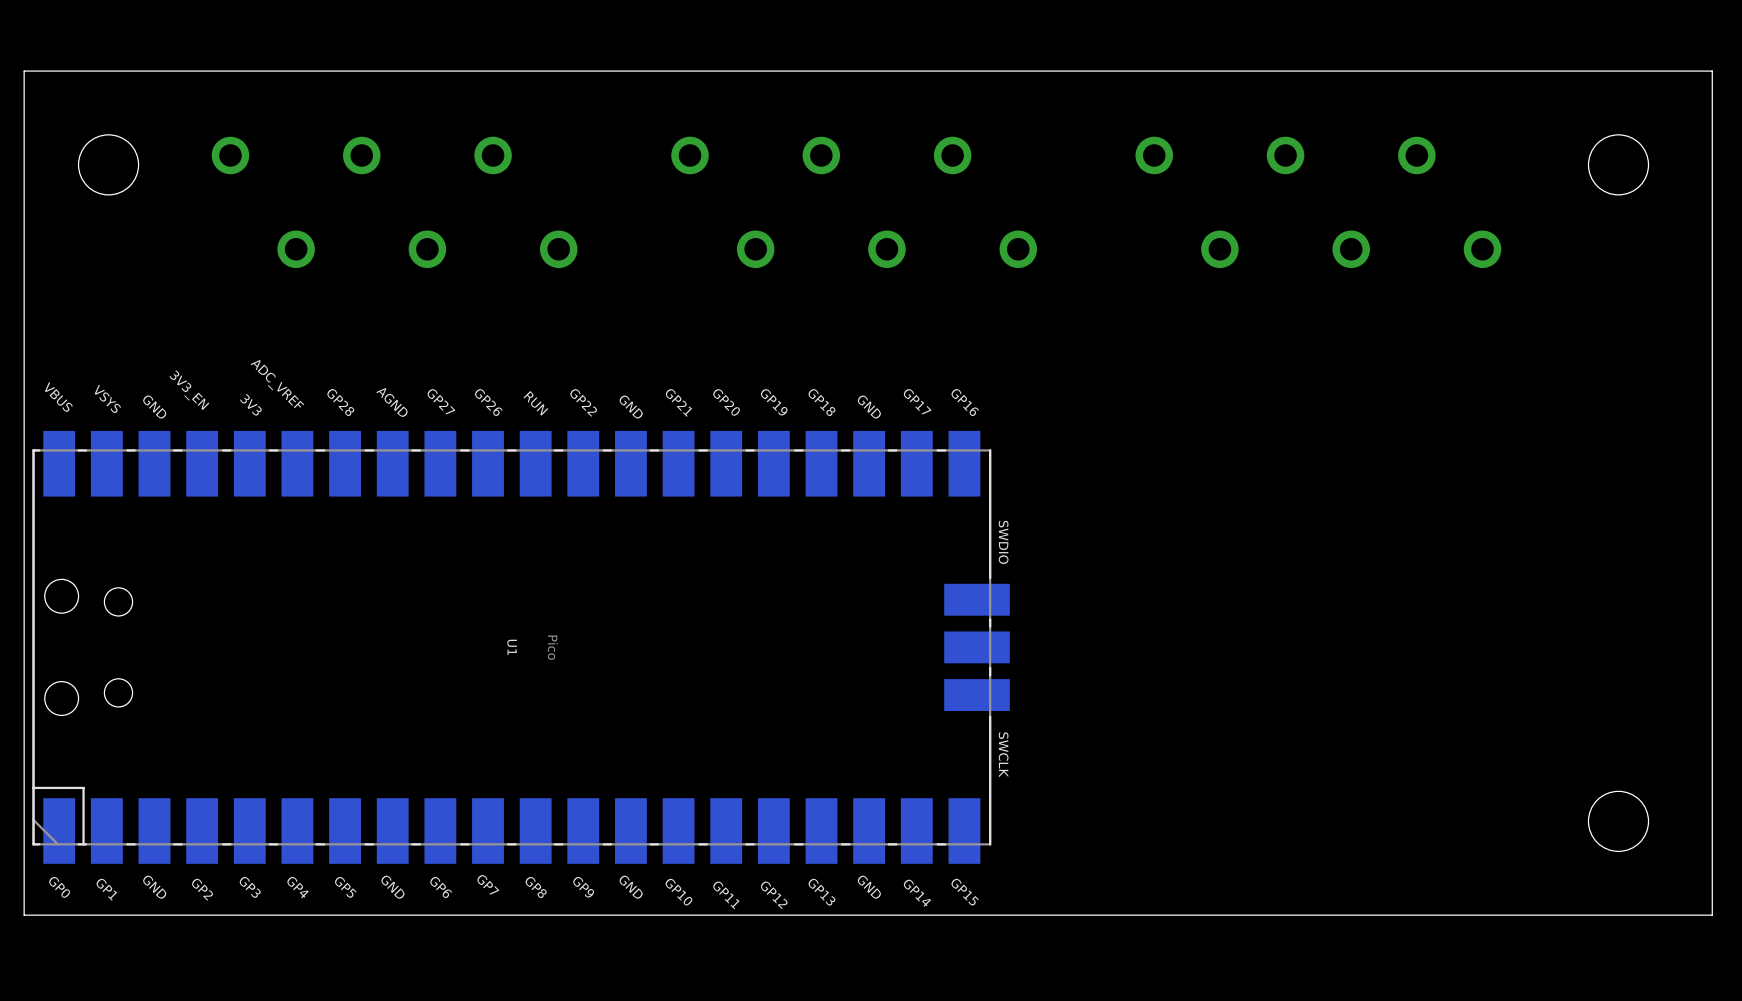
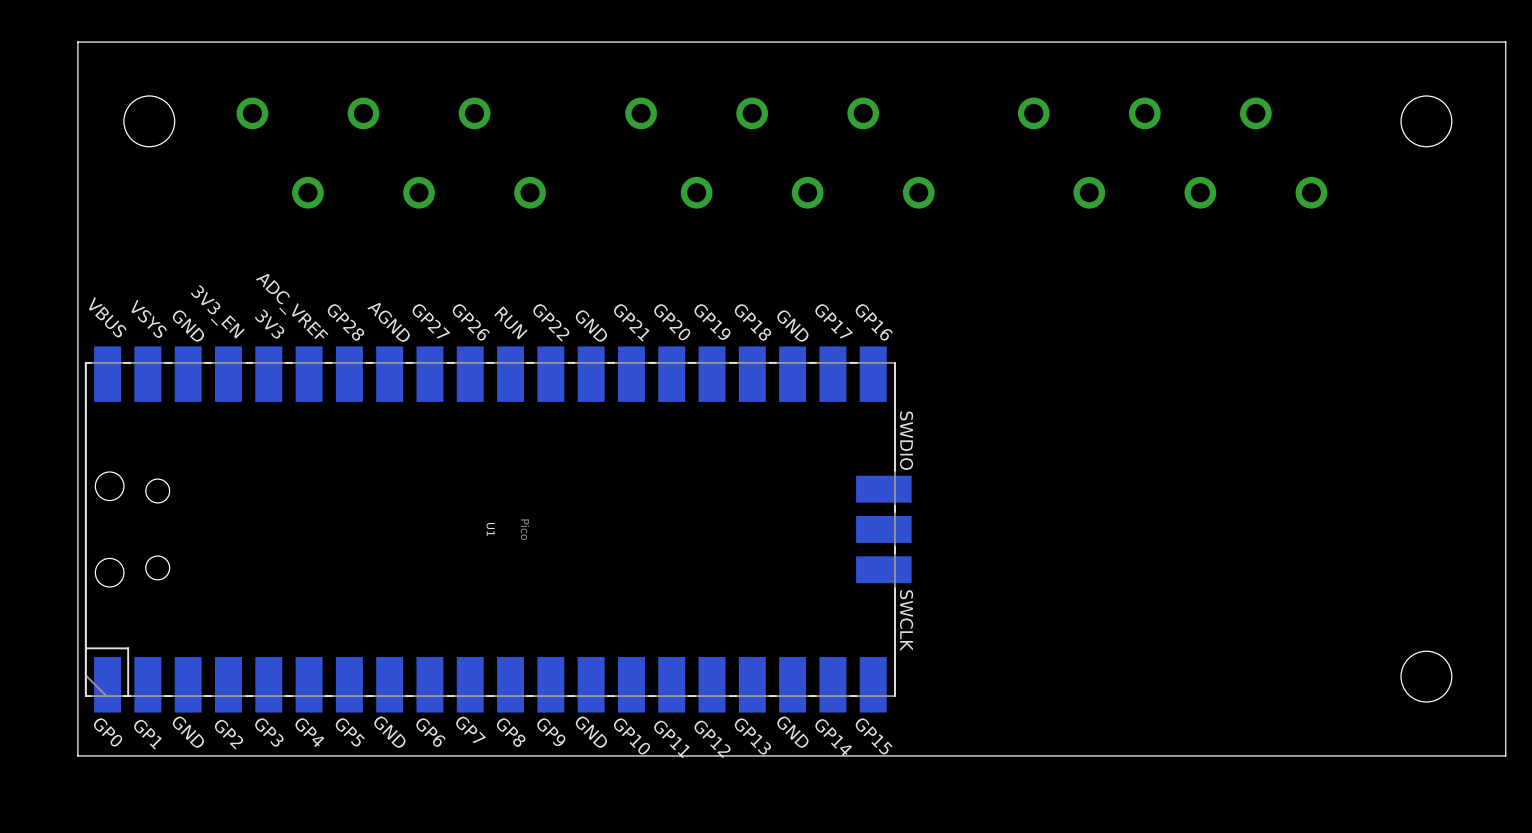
U1 footprint: [32, 430, 1010, 864] -> [84, 346, 912, 713]

